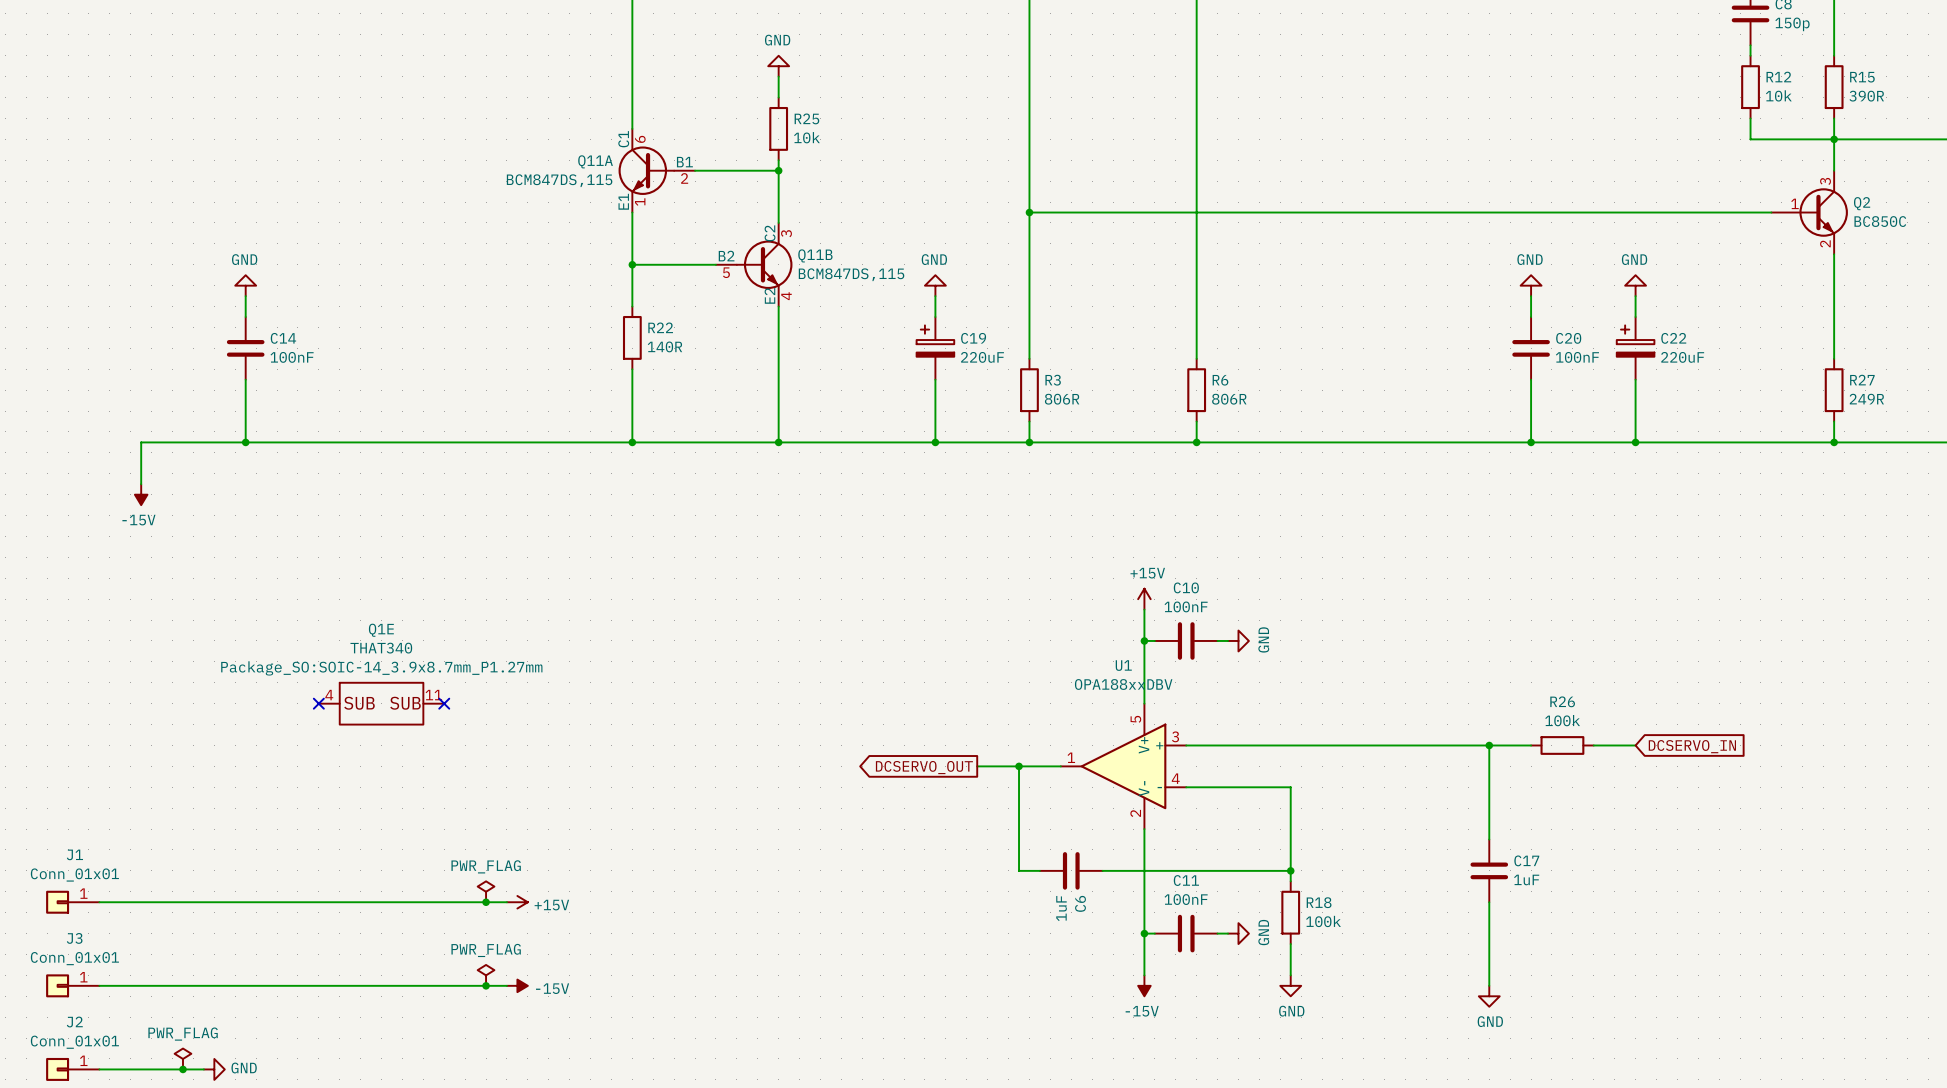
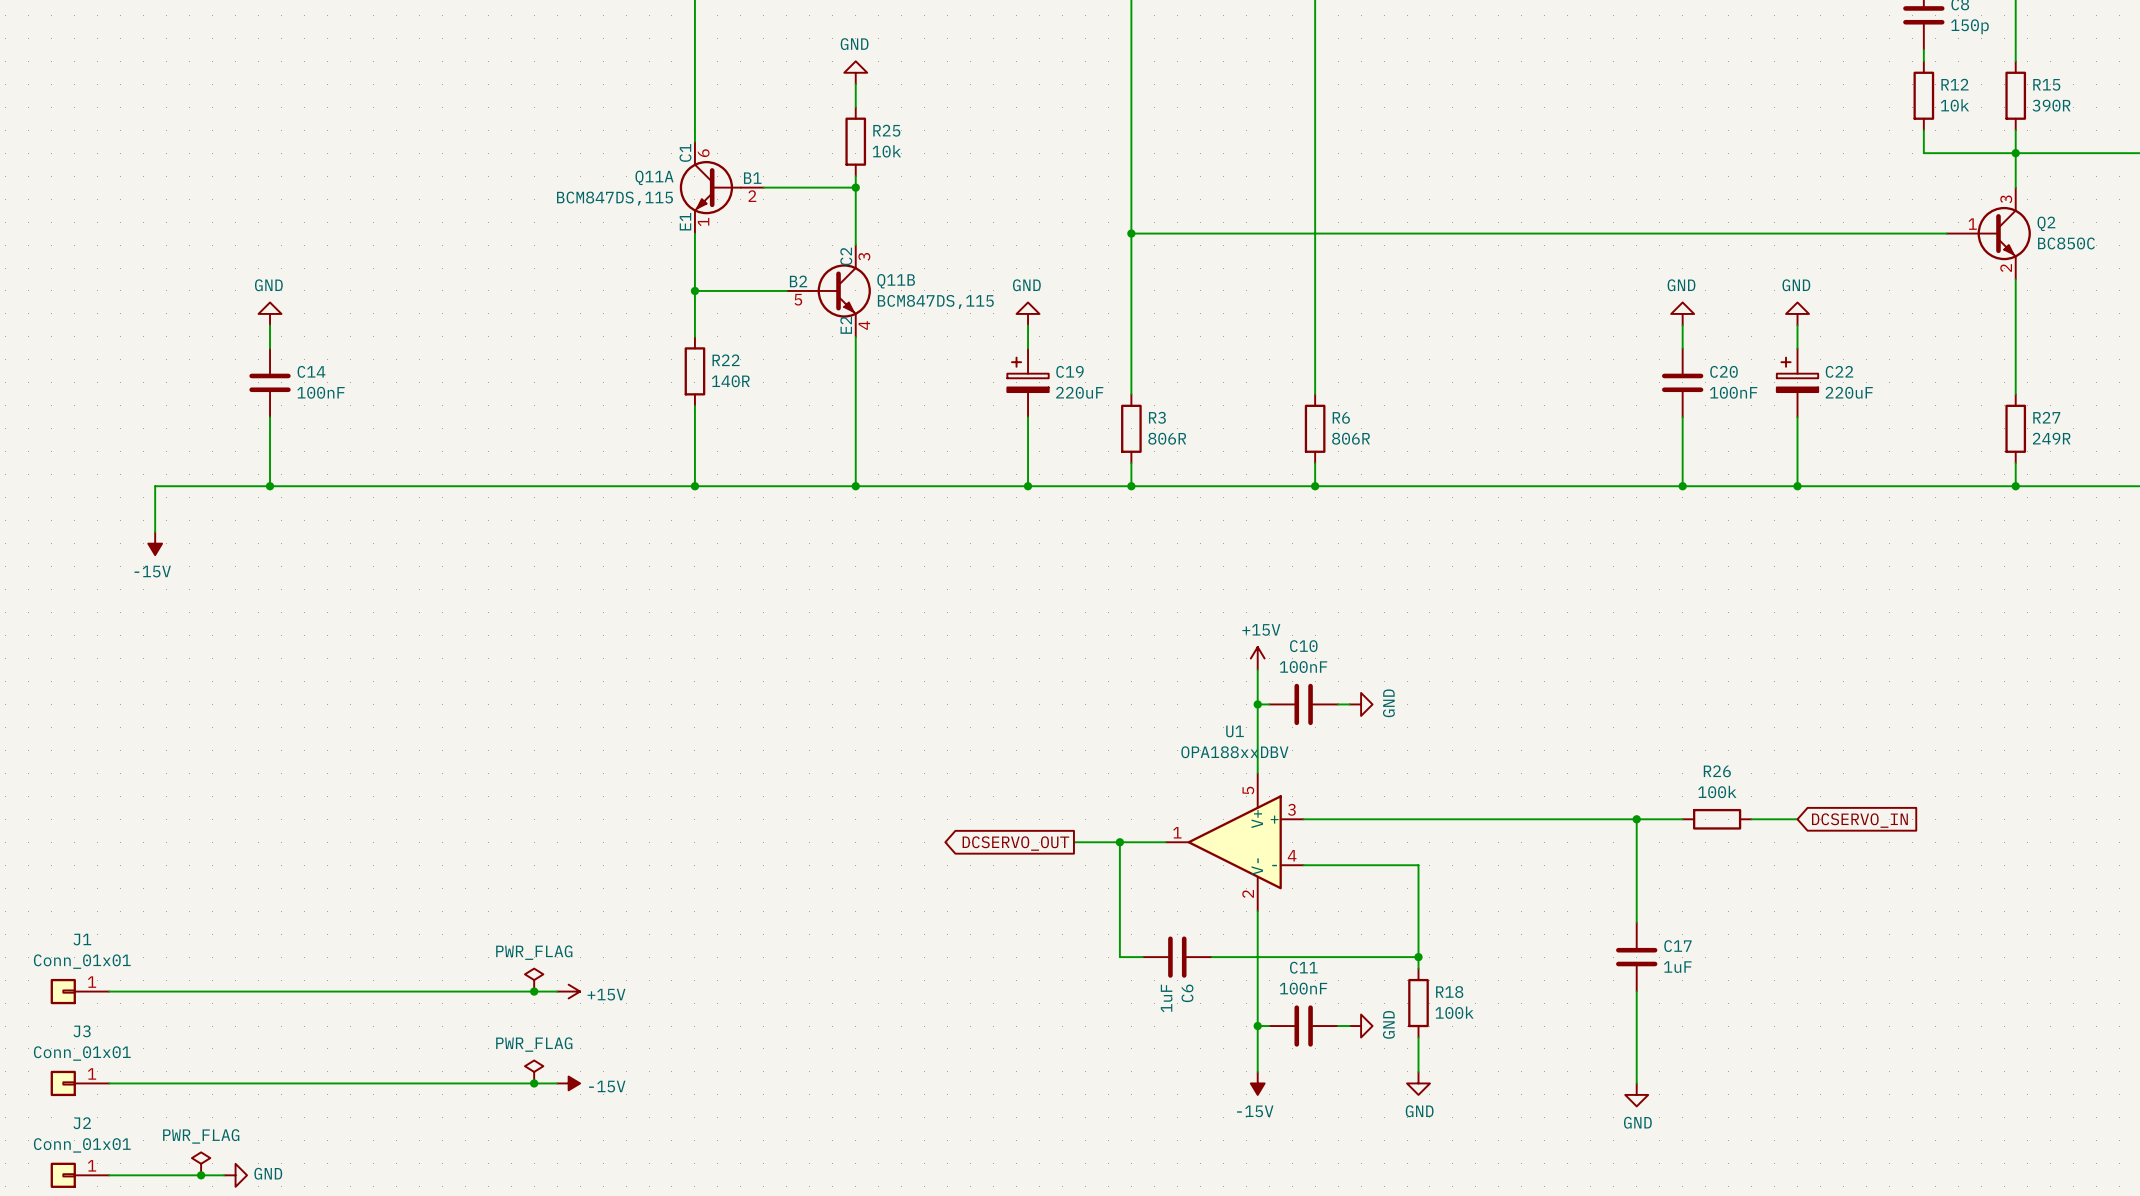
no-connect mark: (318, 703) -> none
Q1E: THAT340 (381, 703) -> none
no-connect mark: (444, 703) -> none

